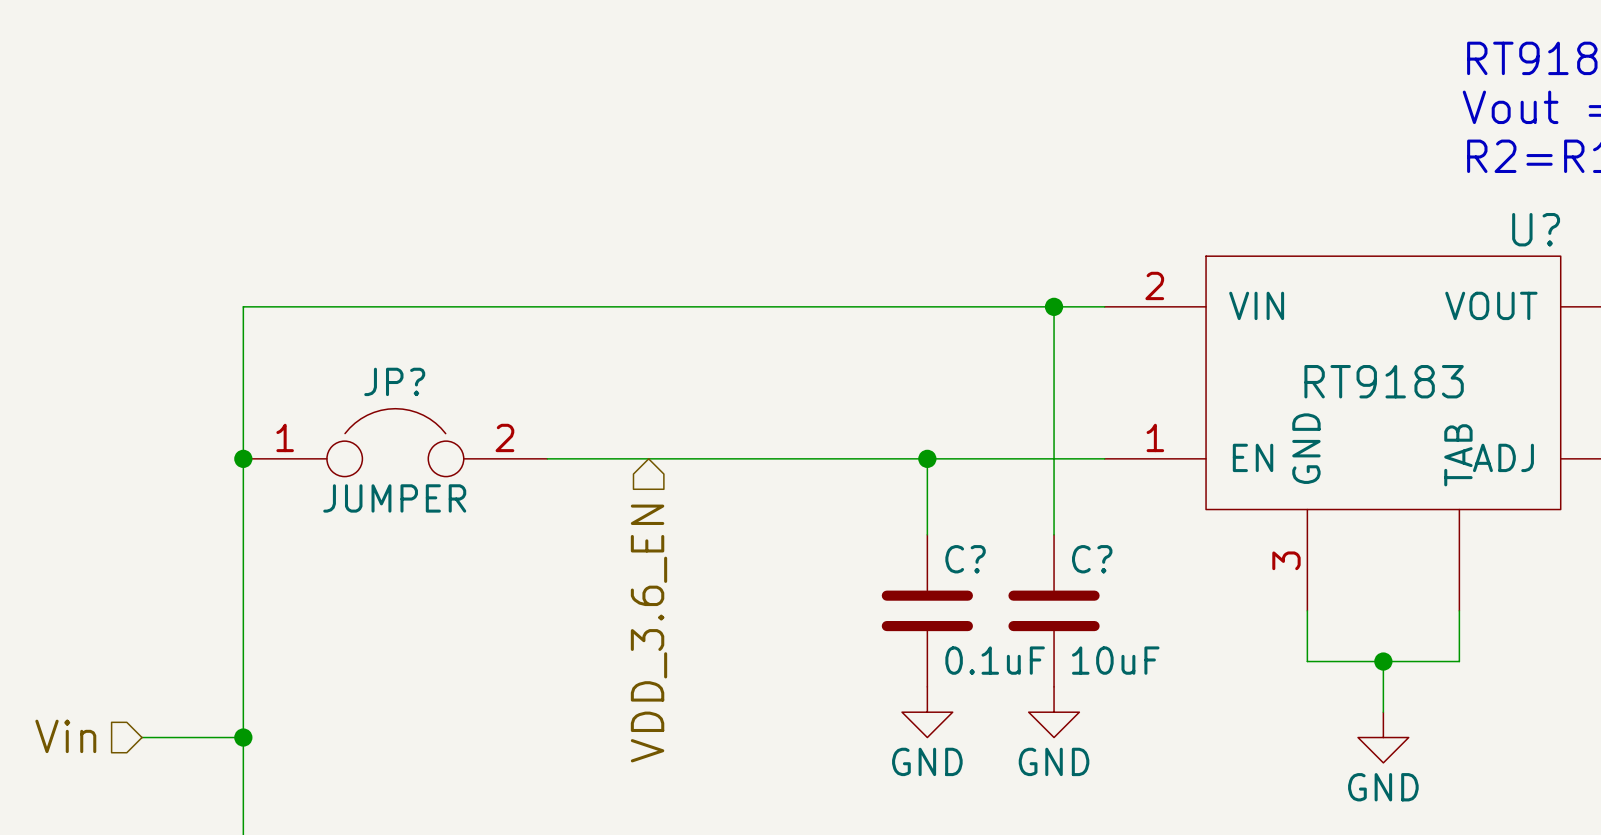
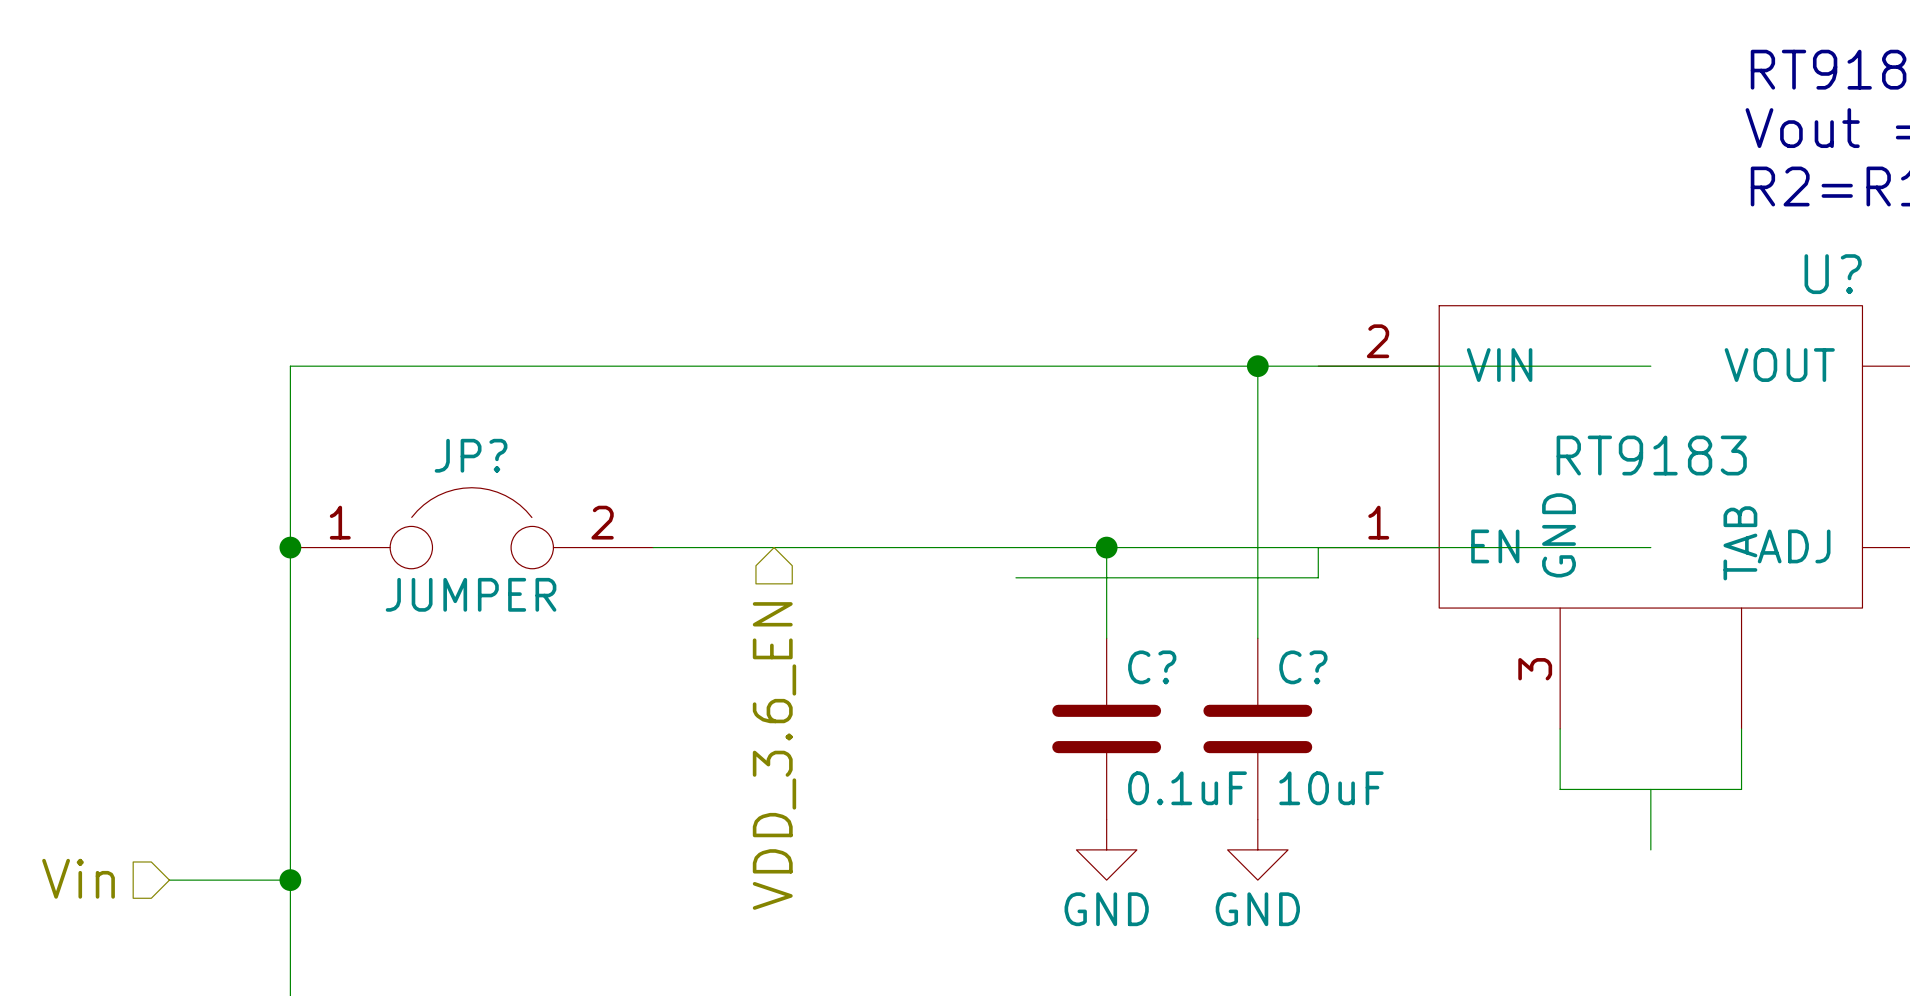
wire: none -> (1318, 366) (1650, 366)
wire: none -> (1650, 547) (1318, 547) (1318, 577) (1015, 577)
junction: (1383, 661) -> none
power symbol: GND (1383, 737) -> none

